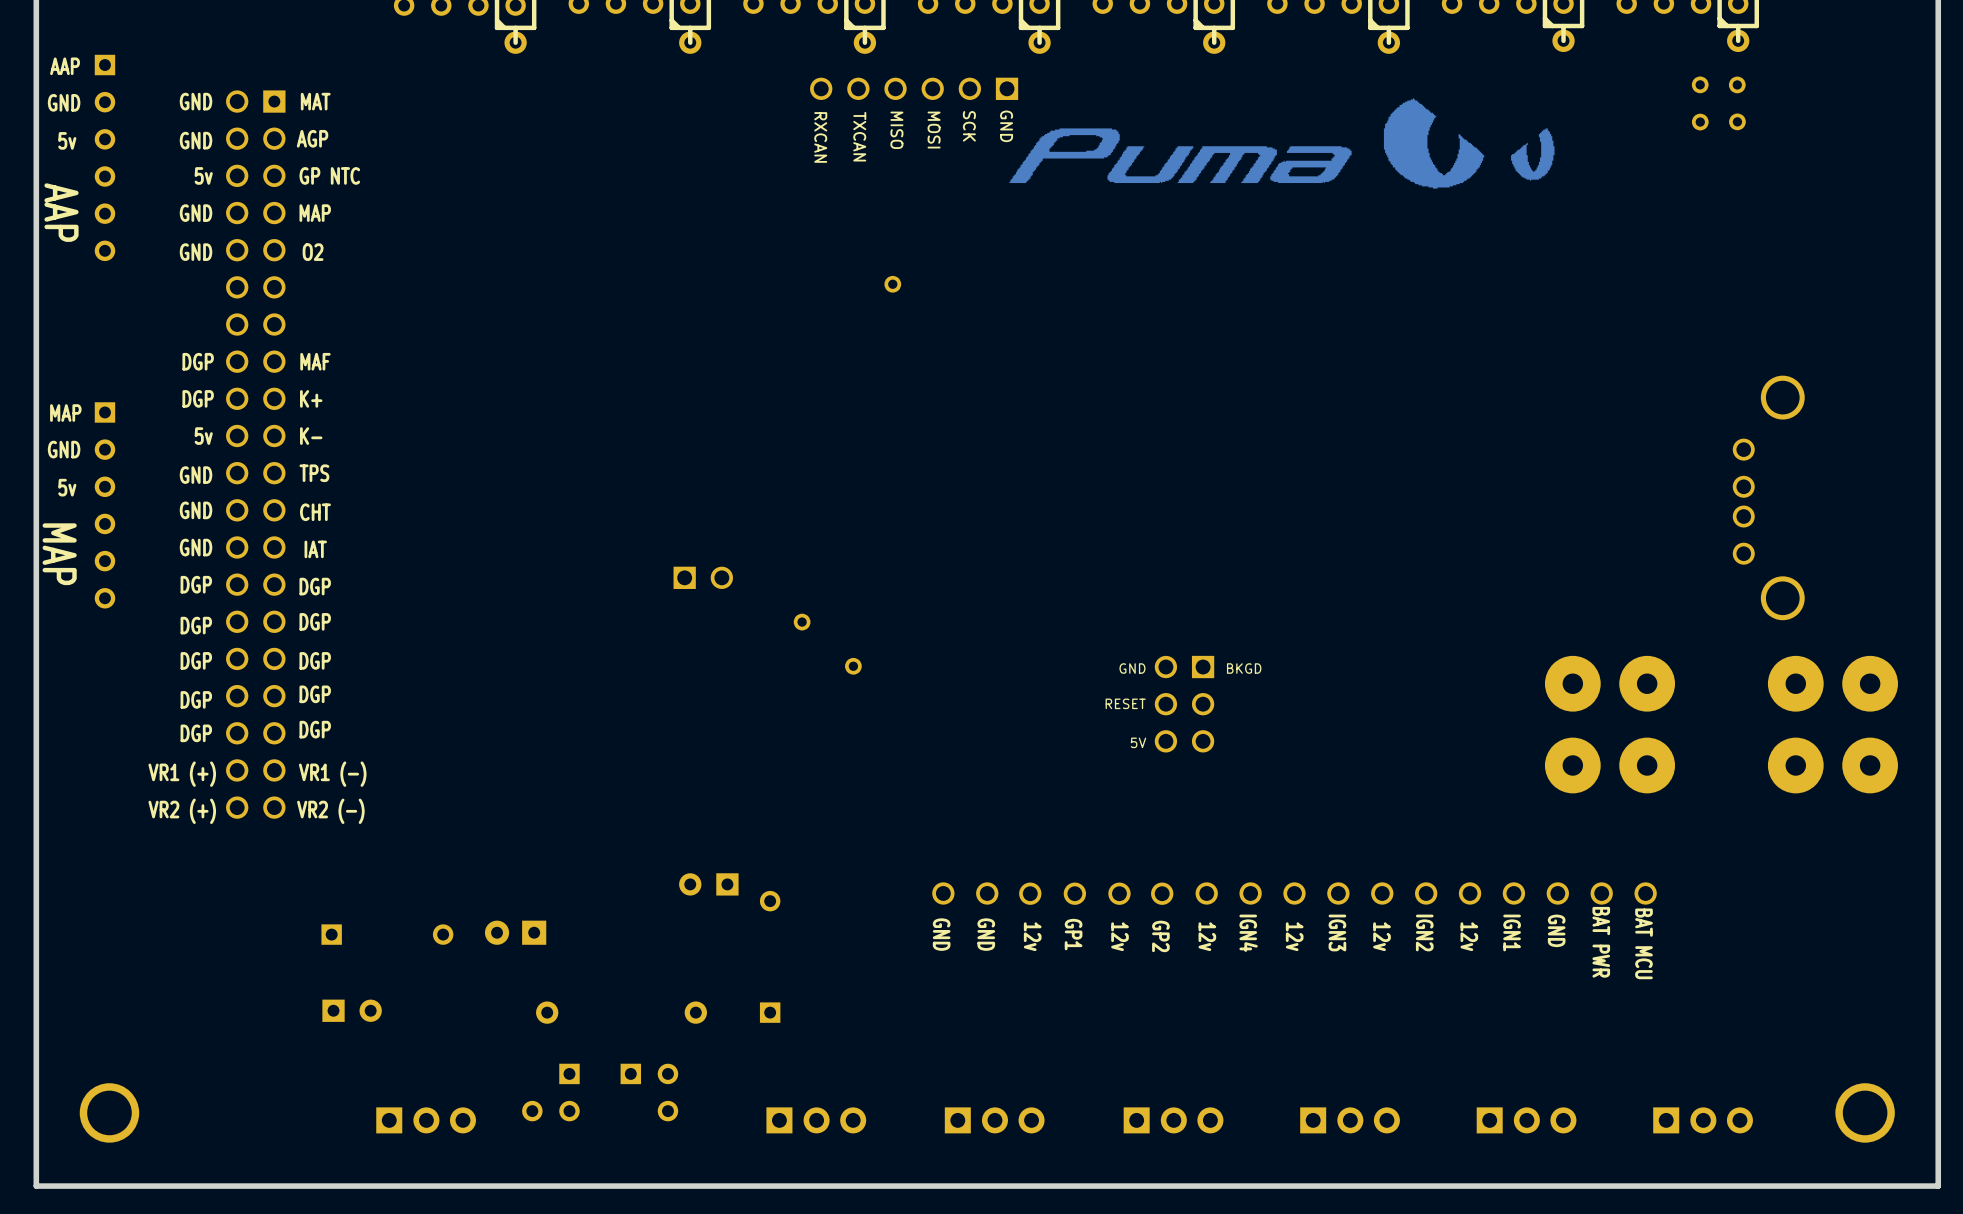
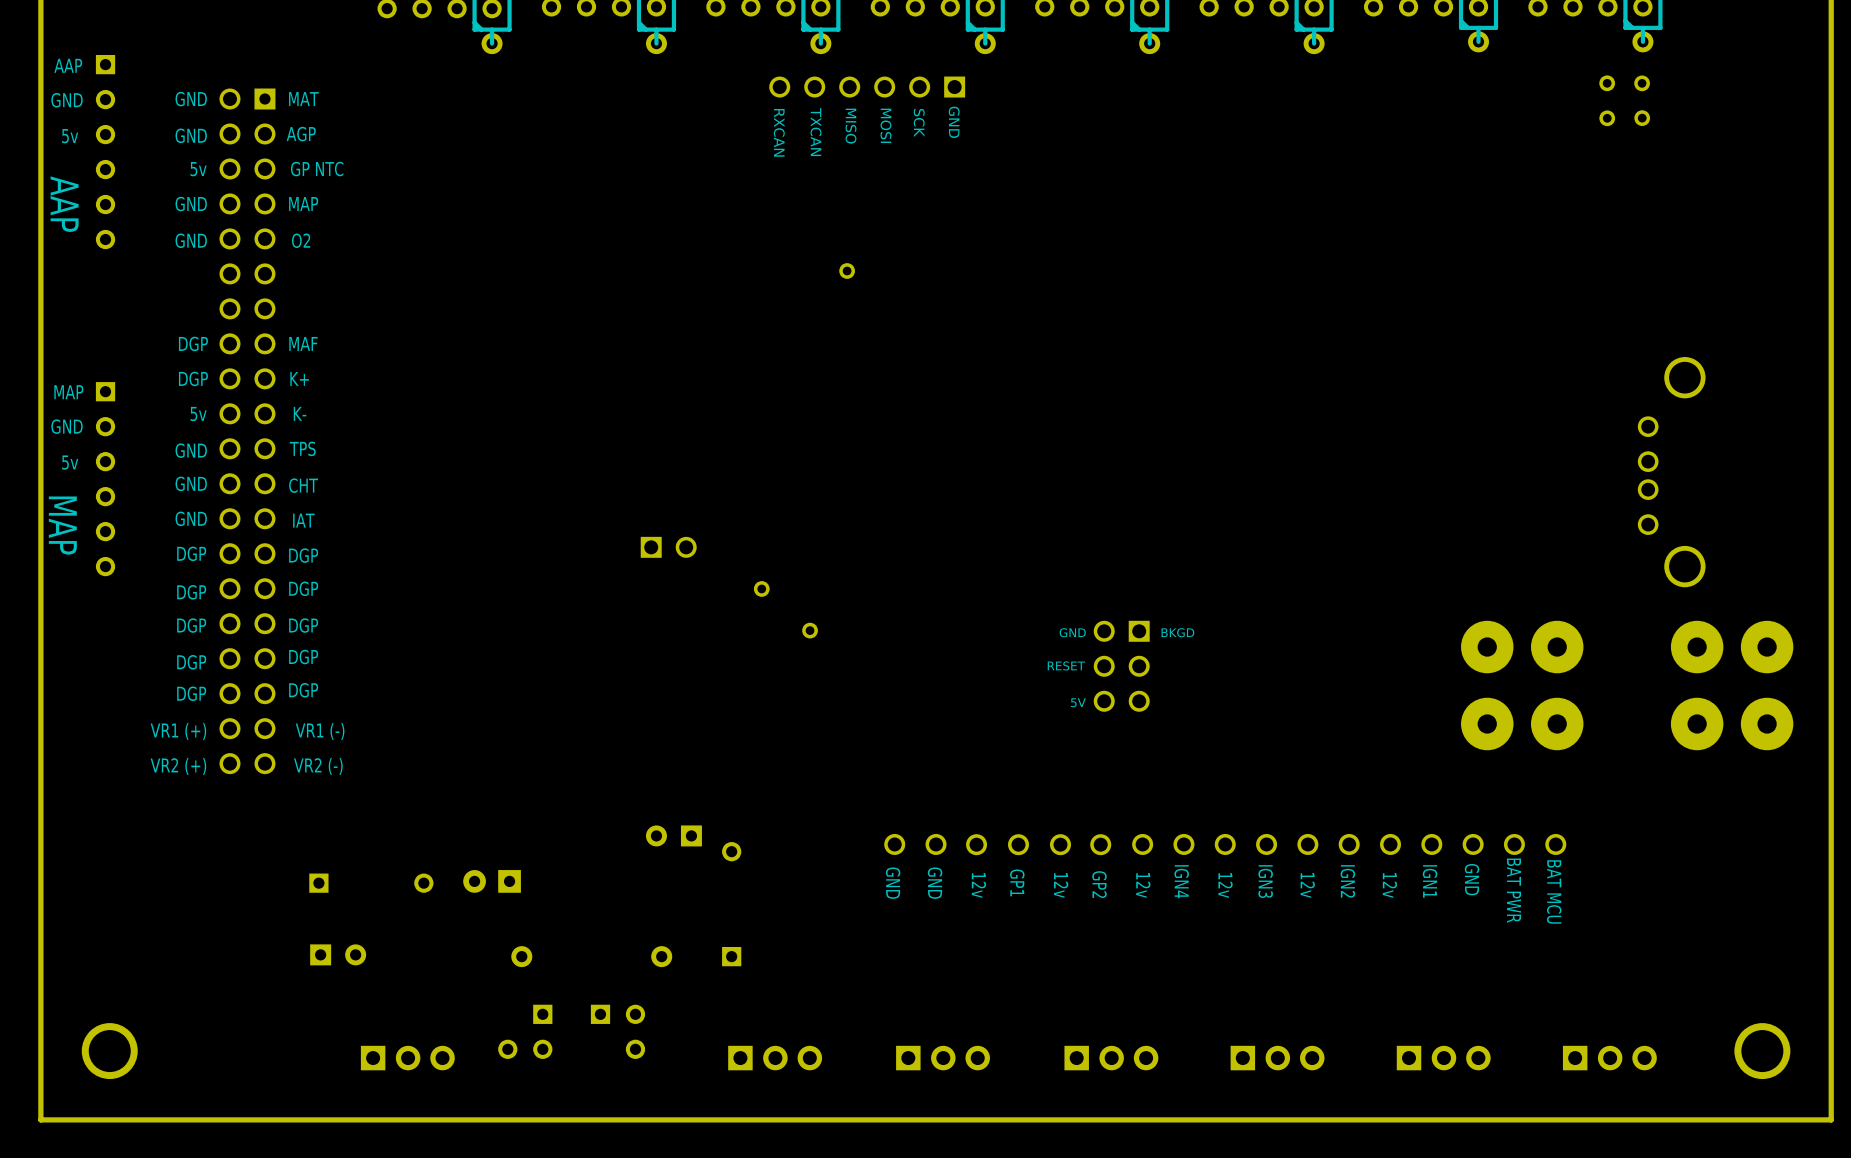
part: (1281, 143) -> none

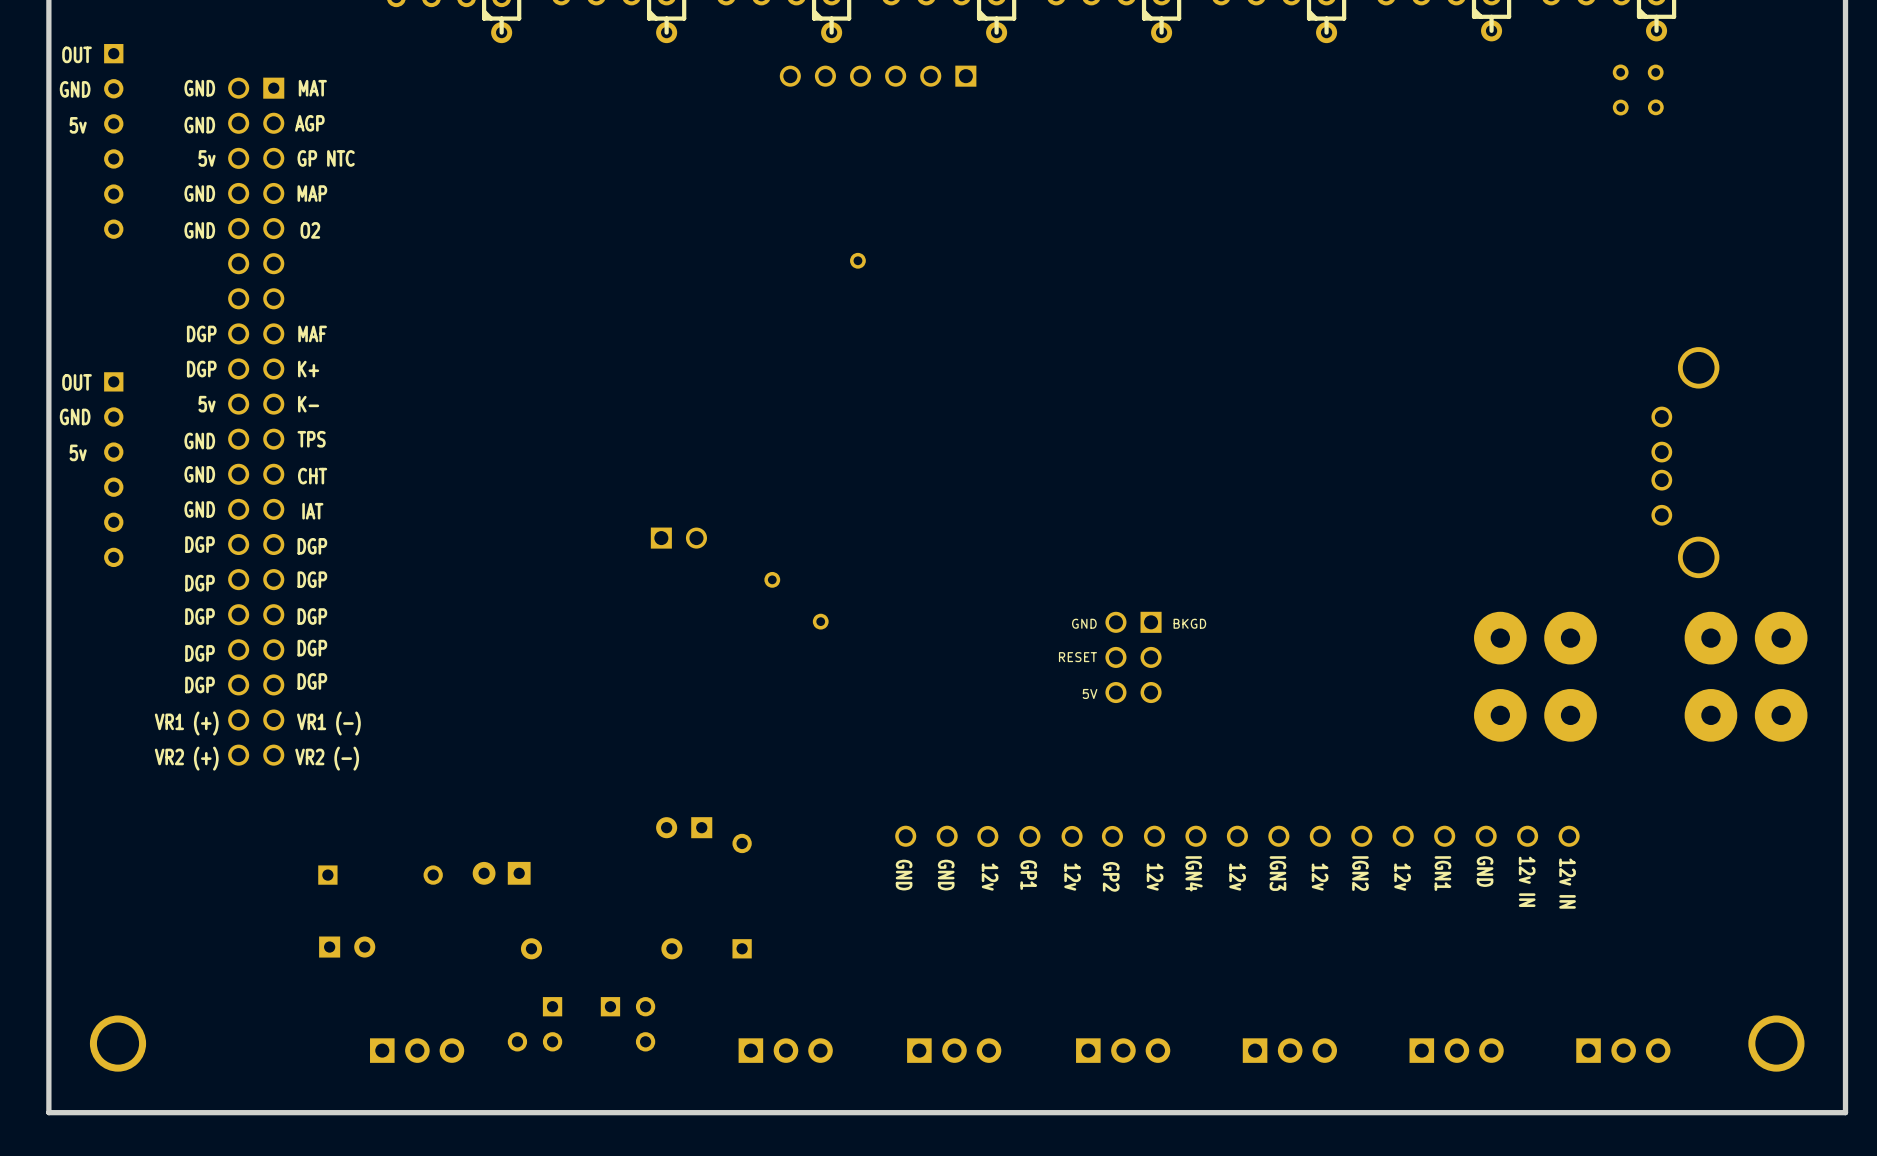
text: AAP (68, 65) -> OUT (77, 54)
text: SCK (919, 122) -> none
text: GND (954, 122) -> none
text: MOSI (885, 125) -> none
text: MISO (850, 126) -> none
text: RXCAN (779, 132) -> none
text: TXCAN (816, 132) -> none
text: AAP (64, 204) -> none
text: MAP (68, 392) -> OUT (77, 382)
text: MAP (62, 525) -> none
text: BAT PWR (1514, 890) -> 12v IN (1527, 881)
text: BAT MCU (1554, 891) -> 12v IN (1567, 883)

